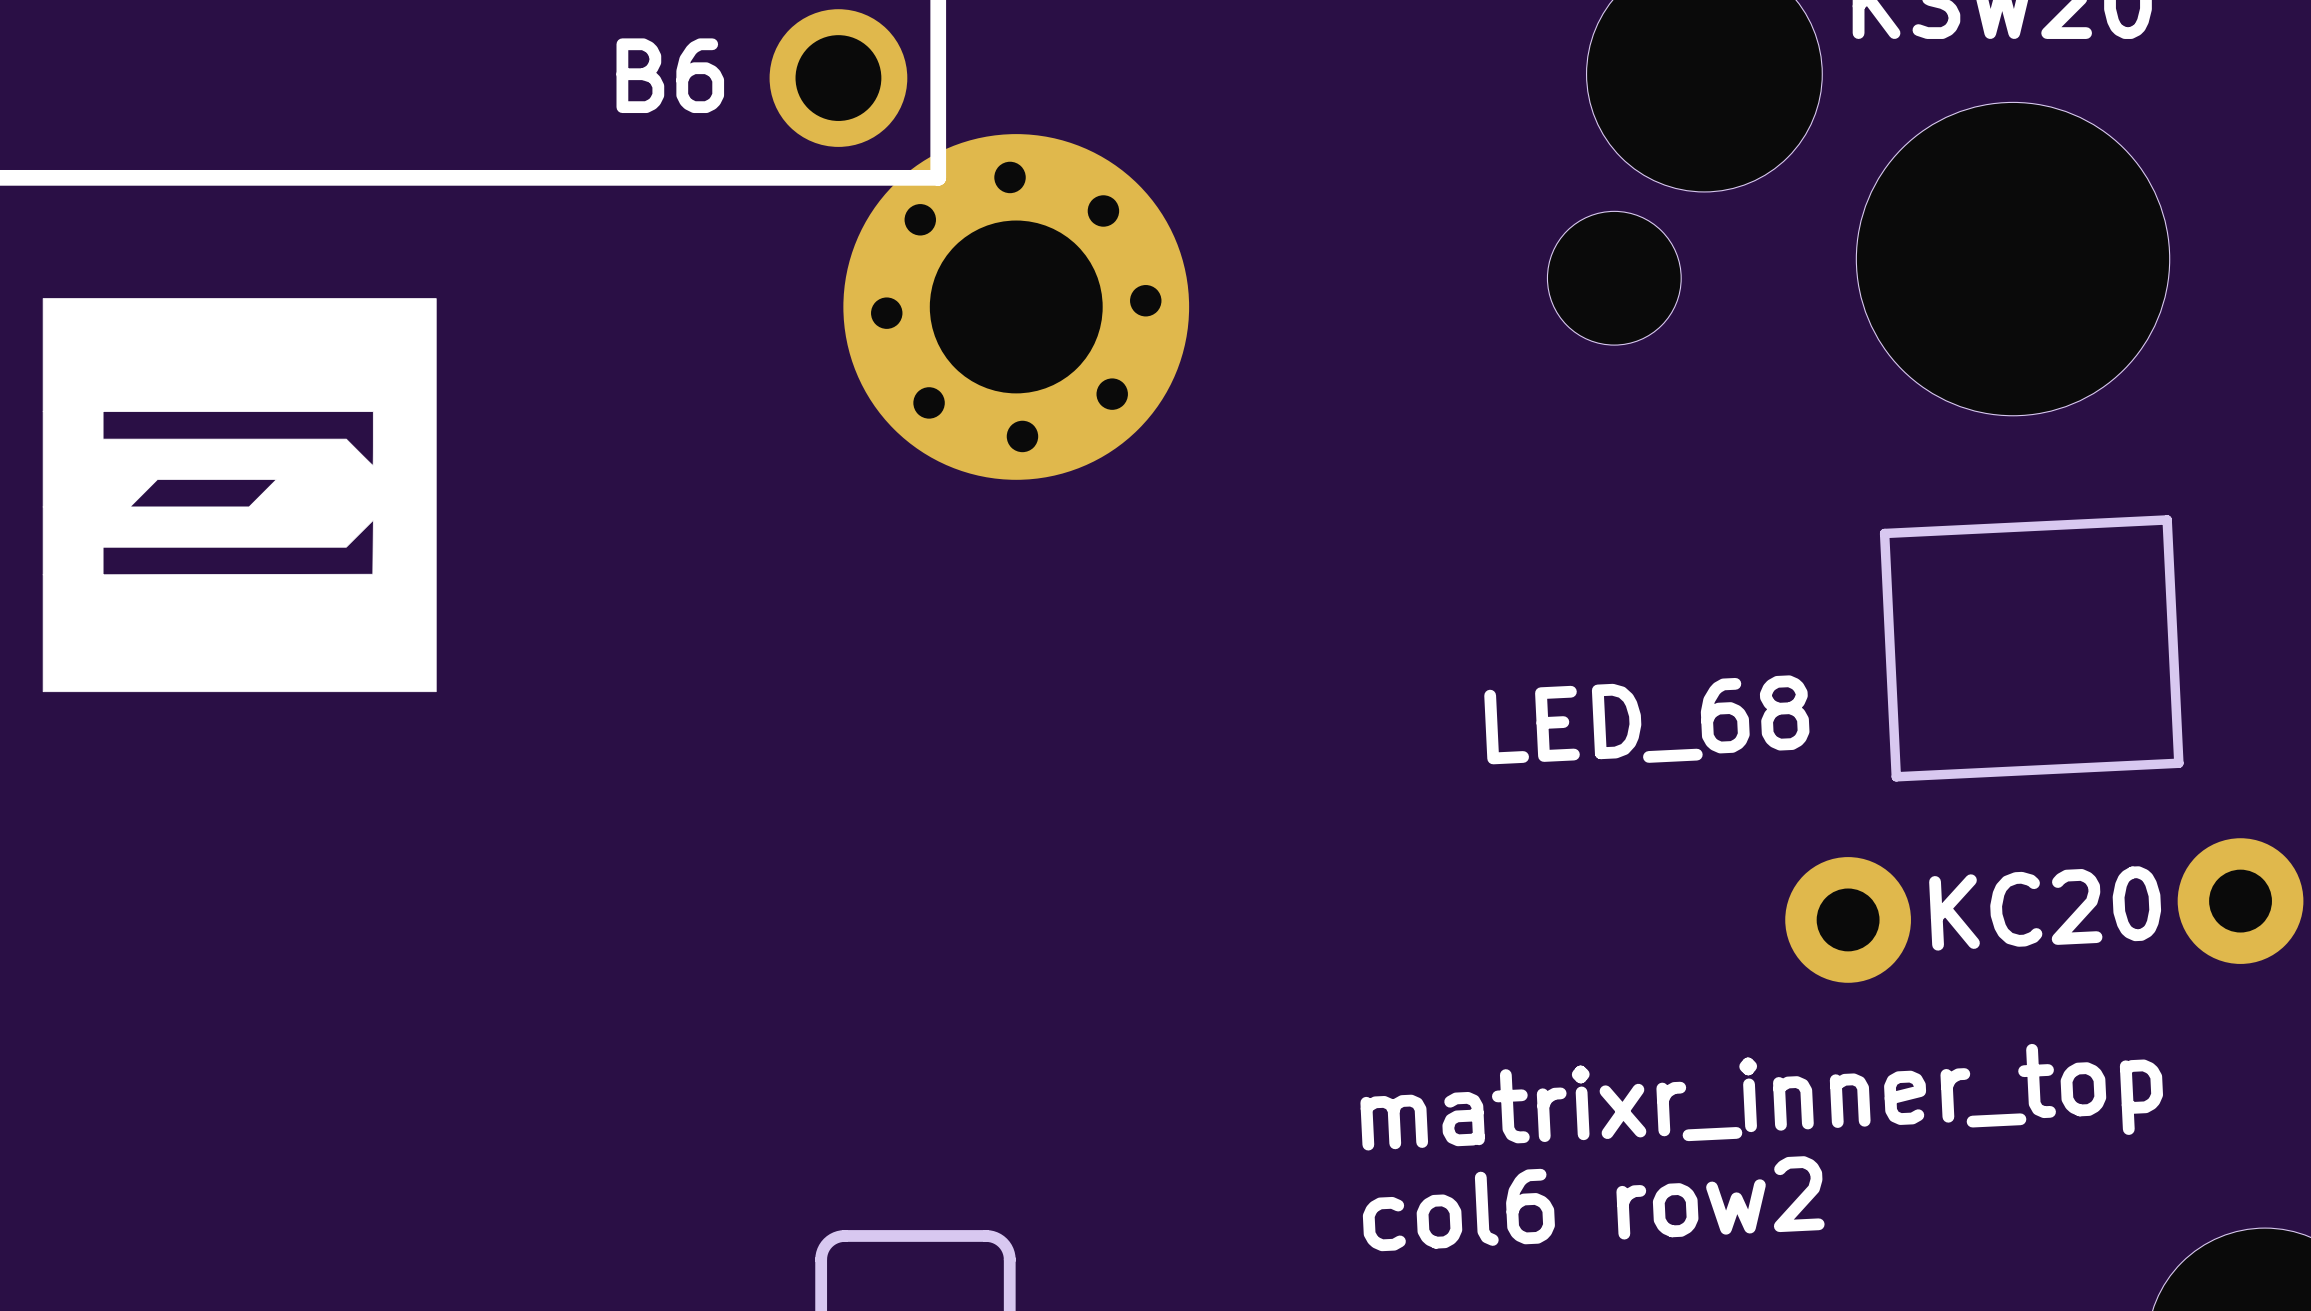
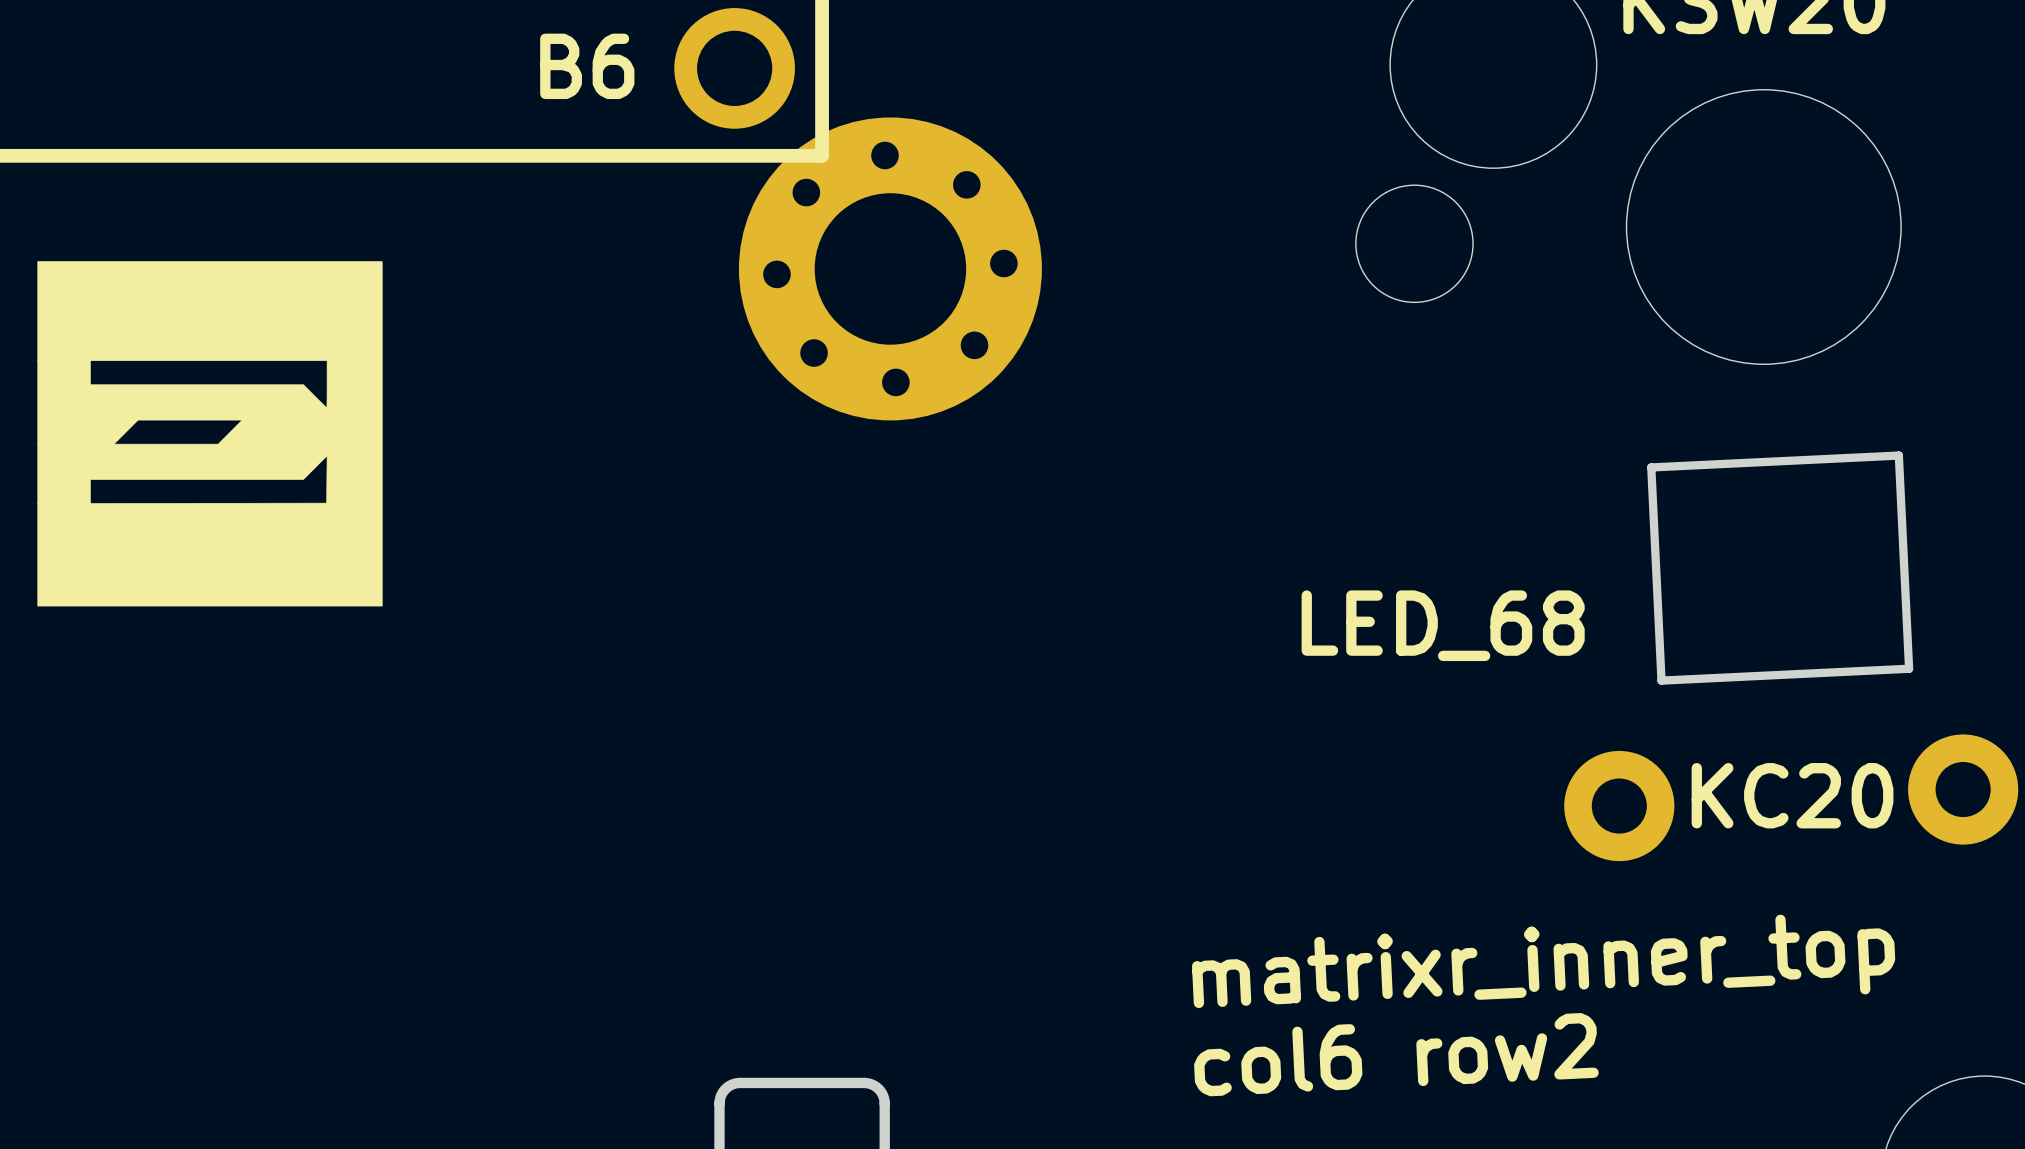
text rotation: 0° (1646, 719) -> 2.8° clockwise (1443, 625)
text rotation: 0° (2045, 908) -> 2.8° clockwise (1792, 795)

